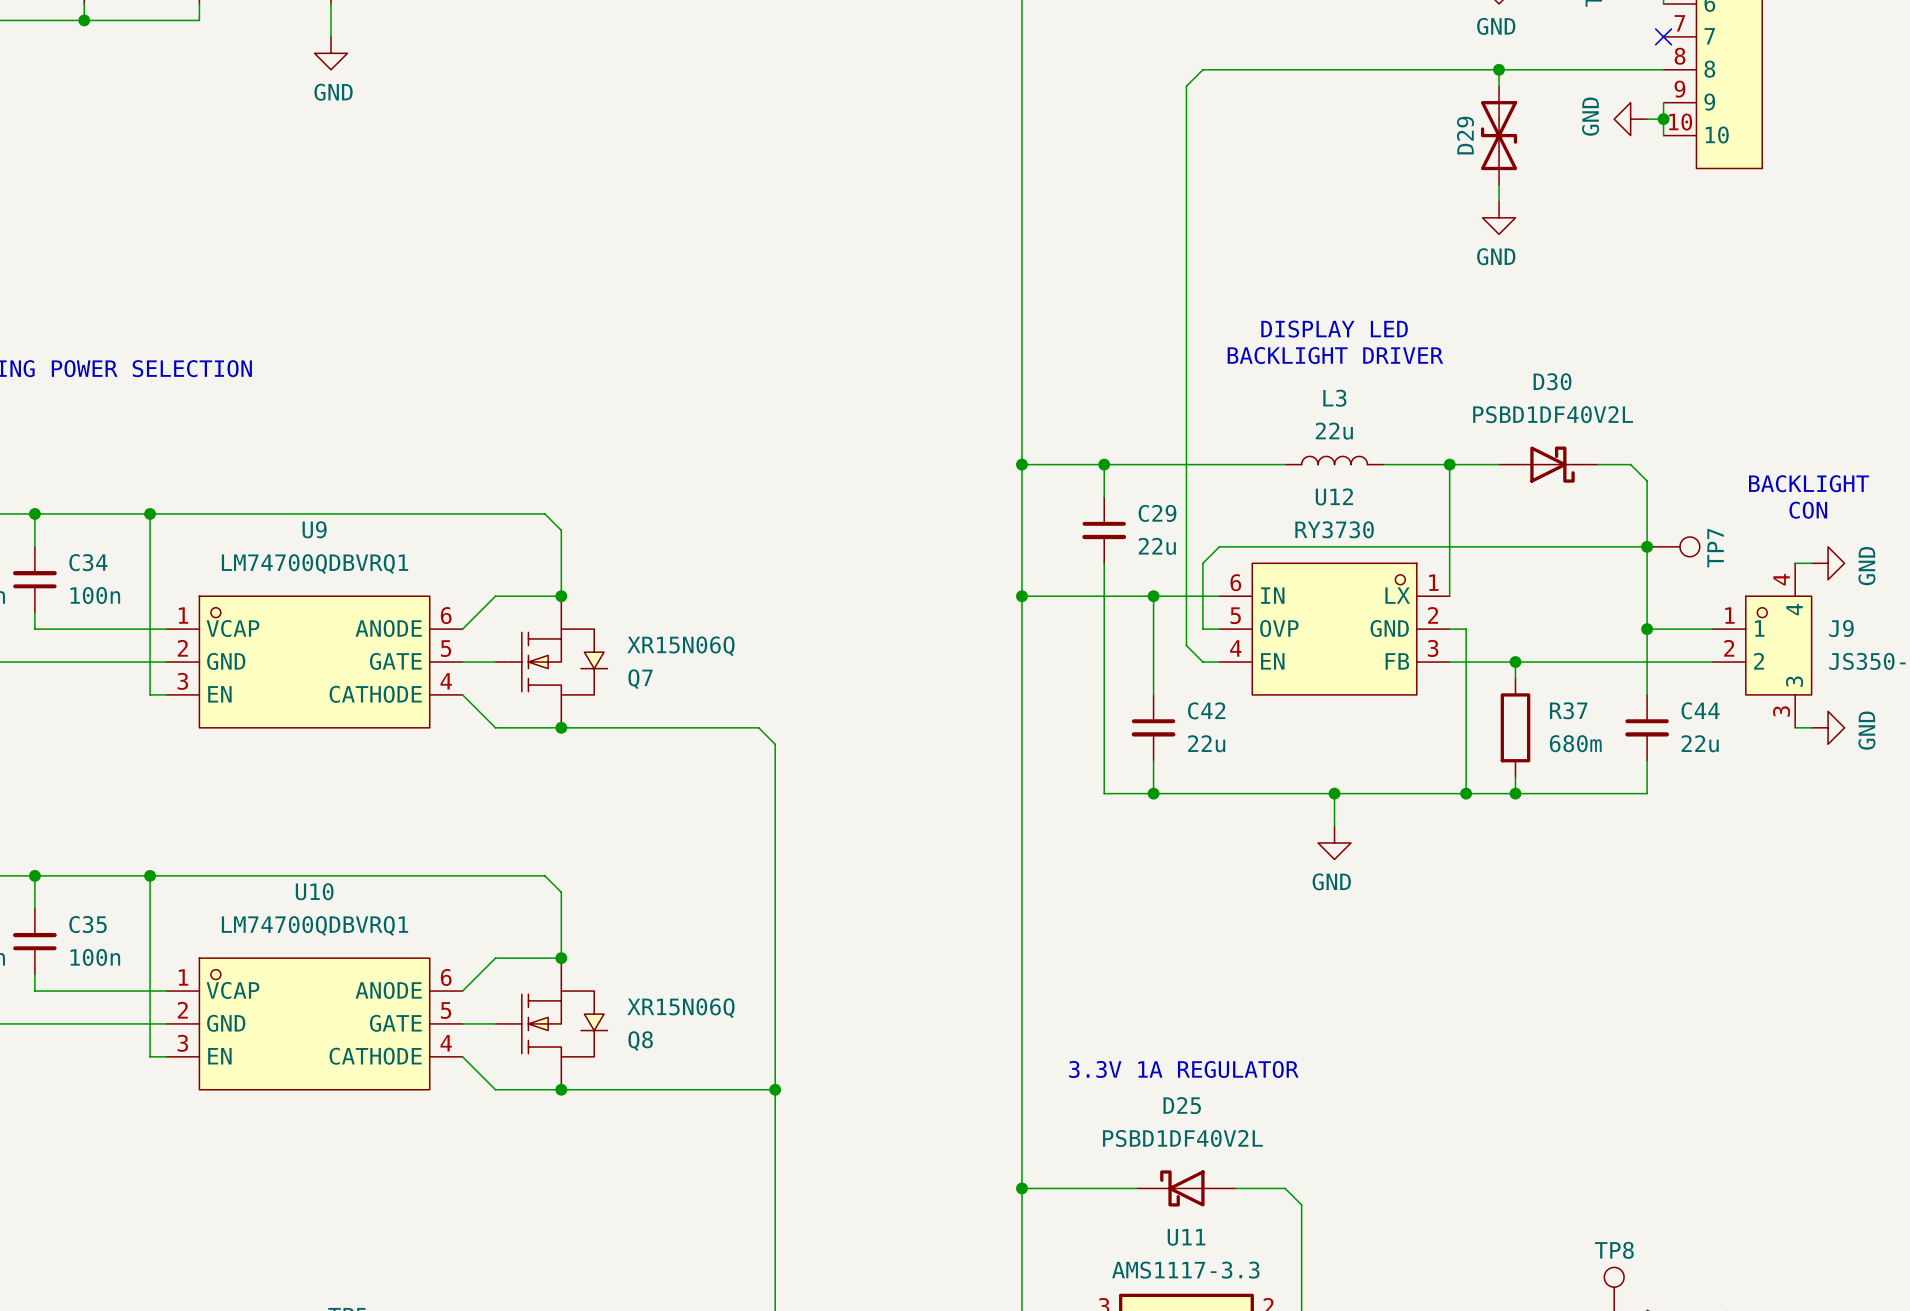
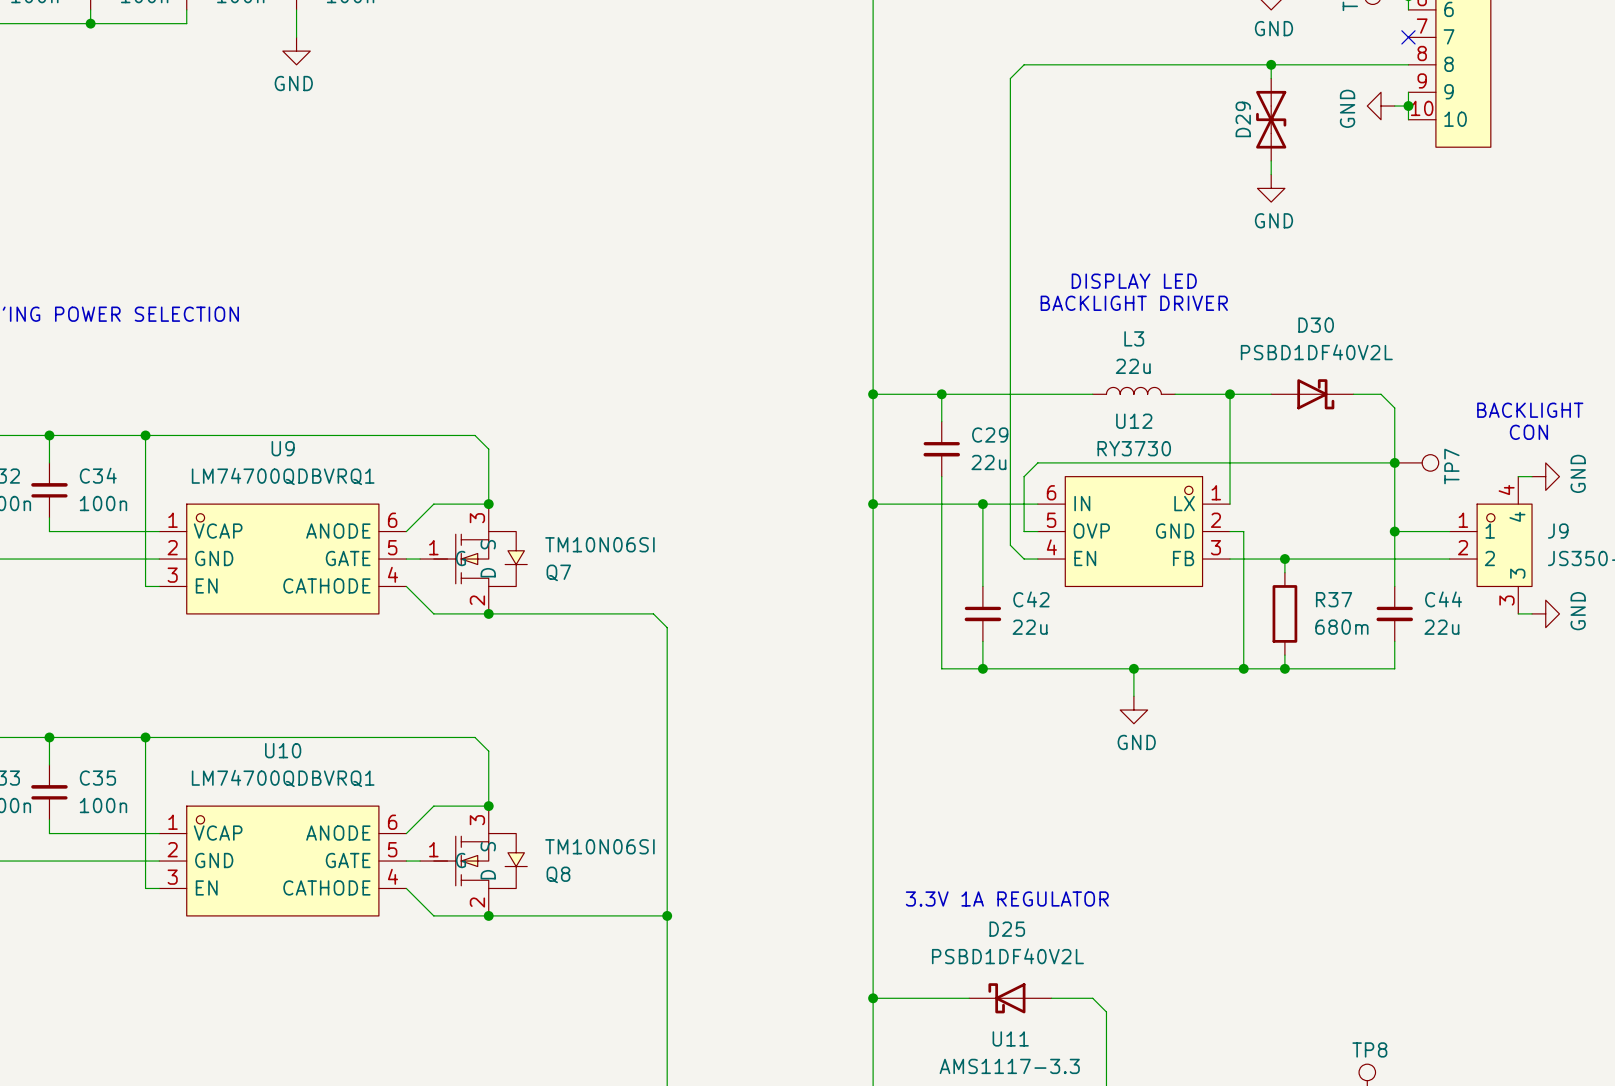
Q7 symbol: [495, 596, 608, 728] -> [420, 504, 528, 614]
Q7 value: XR15N06Q (680, 646) -> TM10N06SI (599, 544)
Q8 symbol: [495, 958, 608, 1090] -> [420, 806, 528, 916]
Q8 value: XR15N06Q (680, 1008) -> TM10N06SI (599, 846)

